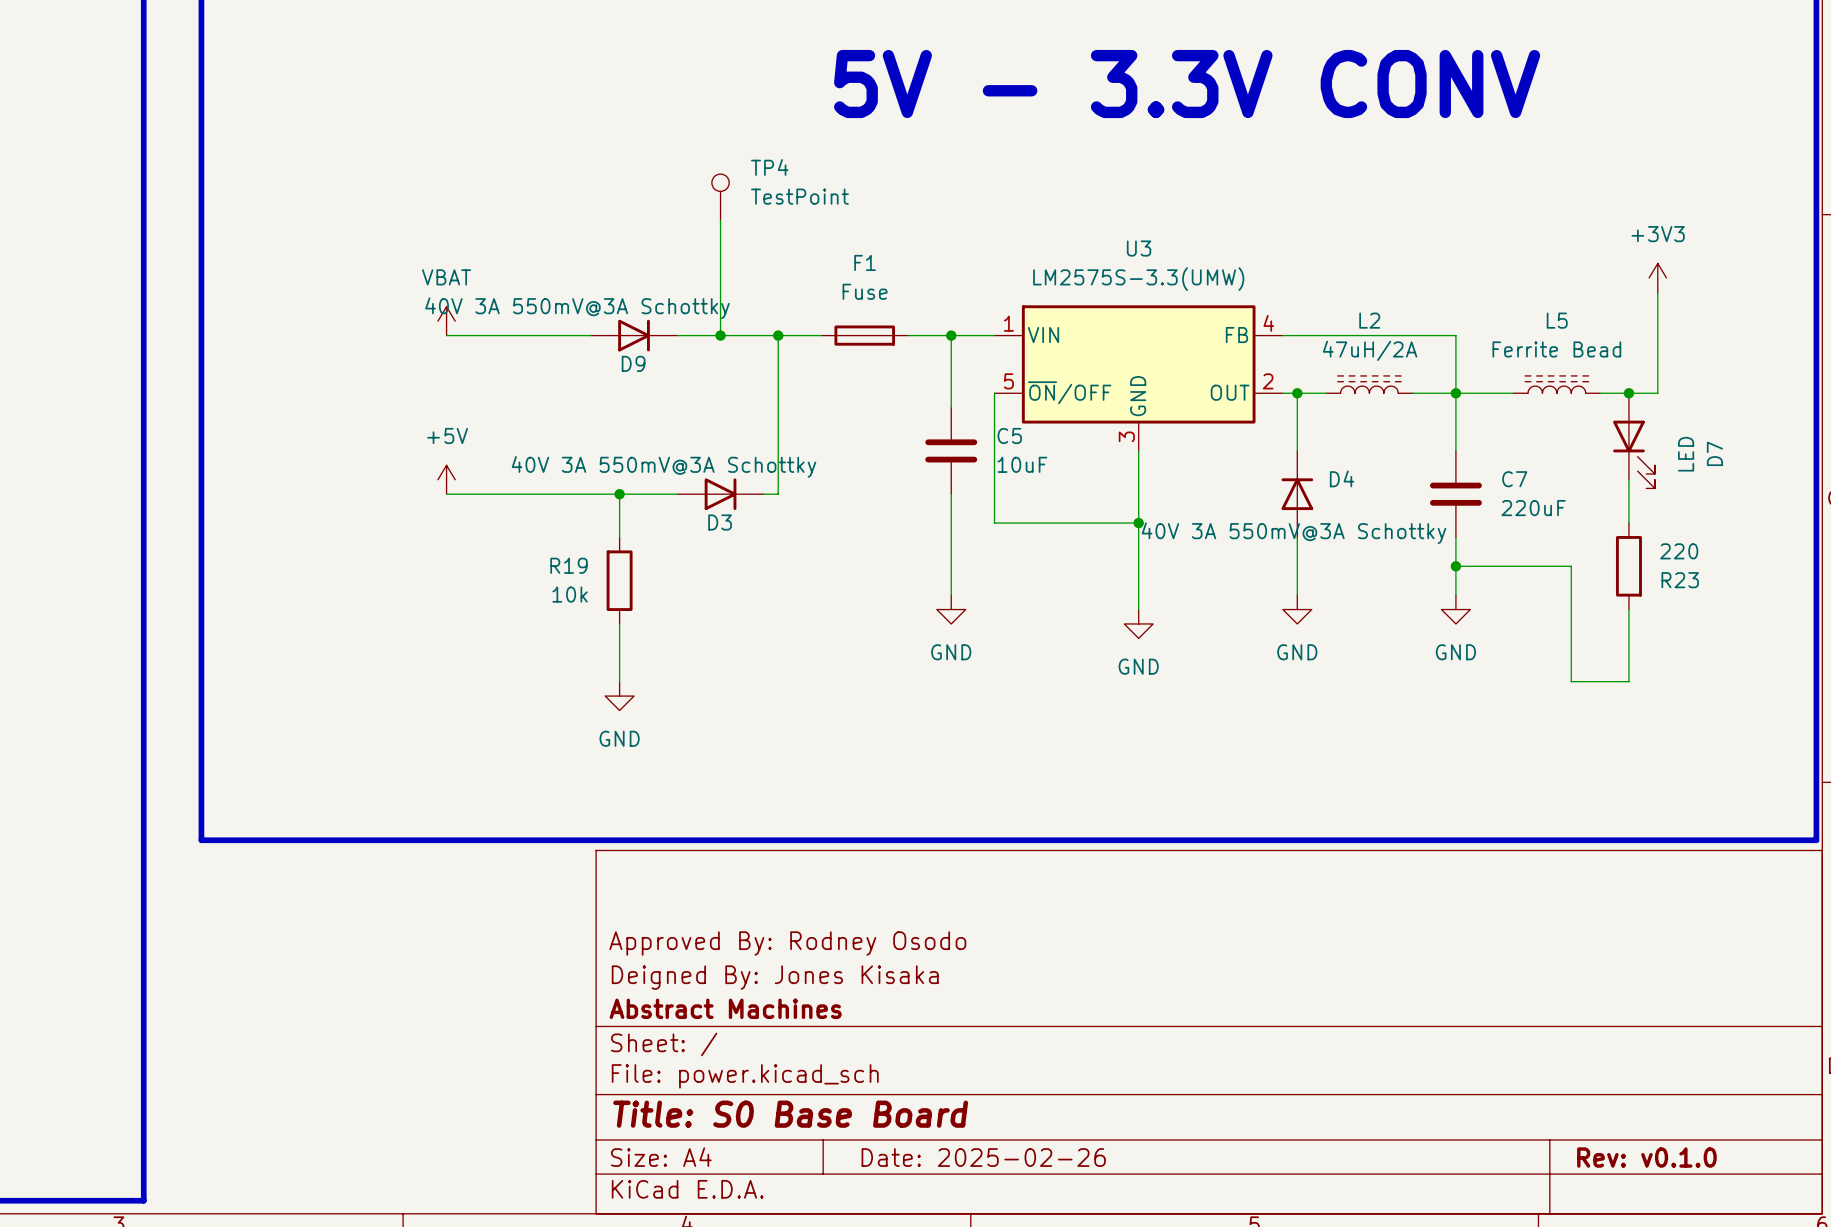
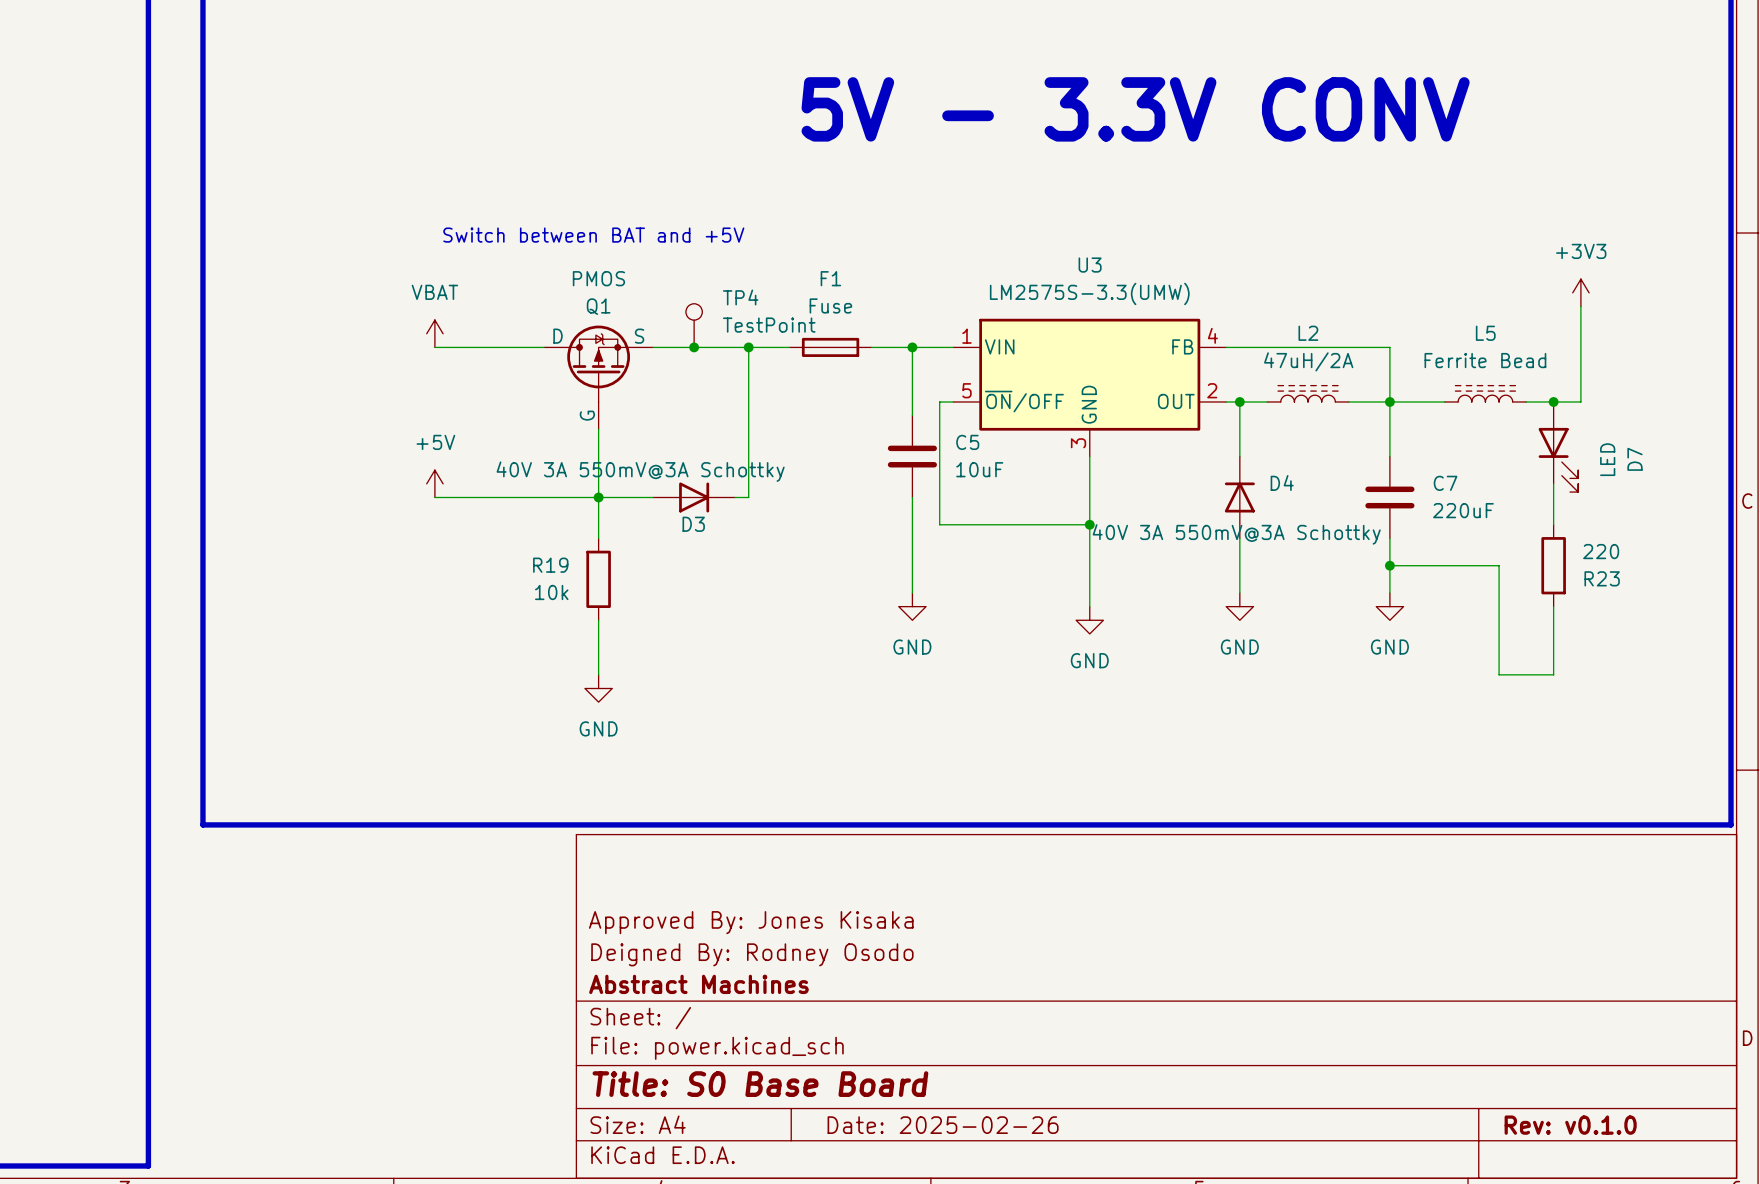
TP4 position: (720, 197) -> (694, 325)
text: none -> Switch between BAT and +5V (593, 235)
wire: (720, 220) (720, 335) -> none
D9: 40V 3A 550mV@3A Schottky (634, 335) -> none
Q1: none -> PMOS (598, 377)
wire: (994, 393) (994, 523) -> (953, 401) (939, 401) (939, 524) (953, 524)
wire: none -> (598, 429) (598, 497)
title block: Approved By: Rodney Osodo (787, 943) -> Approved By: Jones Kisaka (751, 922)
title block: Deigned By: Jones Kisaka (775, 977) -> Deigned By: Rodney Osodo (752, 954)

